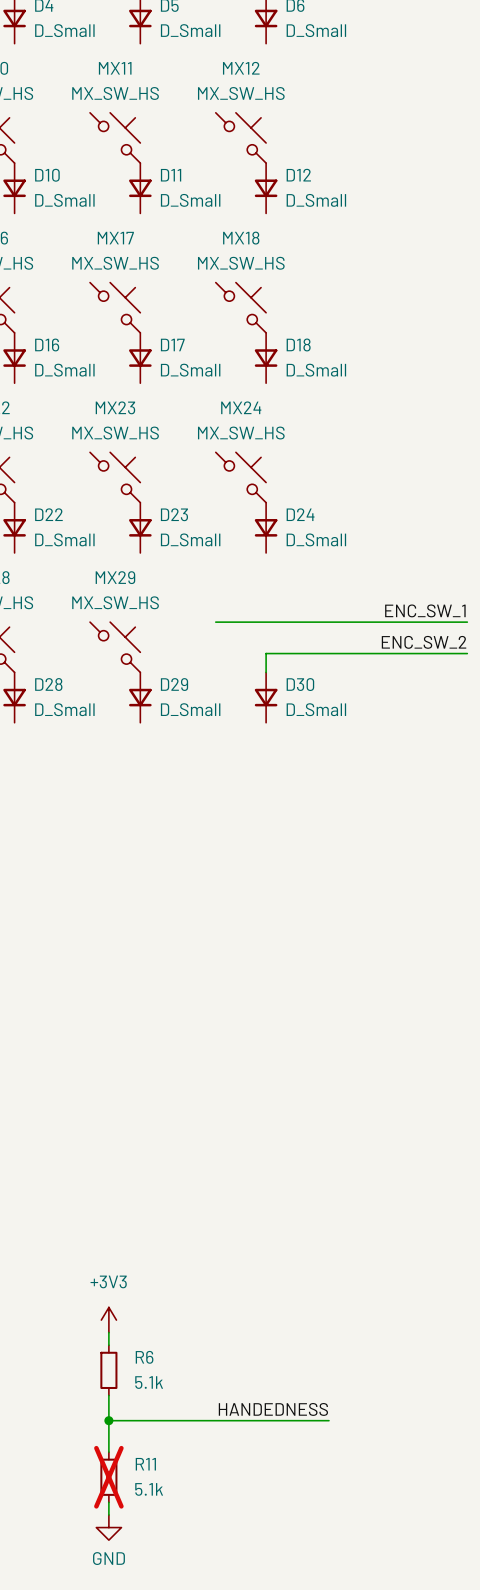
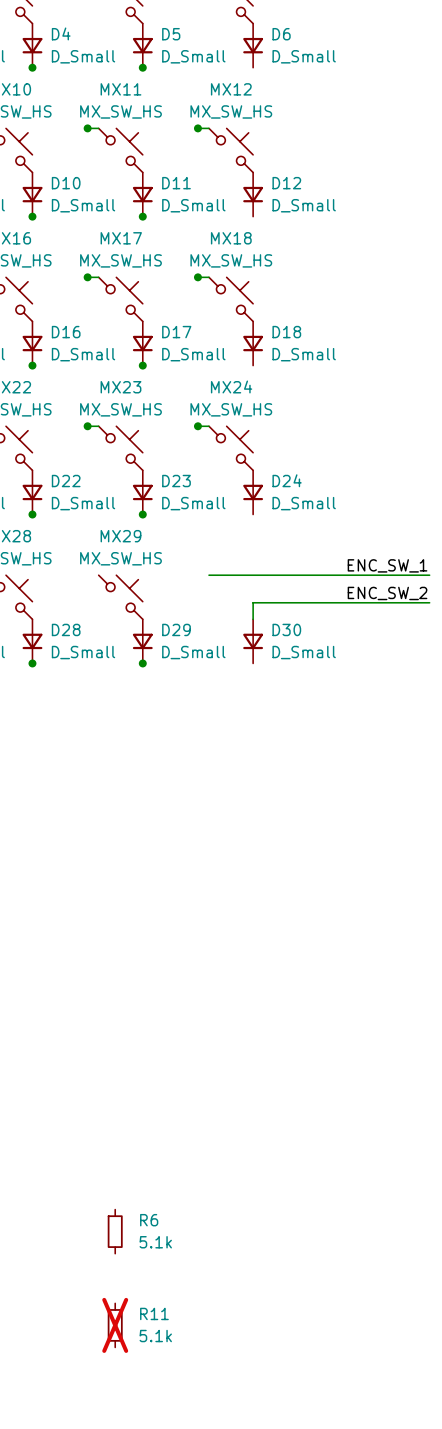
junction: none -> (32, 67)
junction: none -> (142, 67)
wire: none -> (87, 128) (98, 128)
junction: none -> (87, 128)
wire: none -> (197, 128) (208, 128)
junction: none -> (197, 128)
junction: none -> (32, 216)
junction: none -> (142, 216)
wire: none -> (87, 277) (98, 277)
junction: none -> (87, 277)
wire: none -> (197, 277) (208, 277)
junction: none -> (197, 277)
junction: none -> (32, 365)
junction: none -> (142, 365)
wire: none -> (87, 426) (98, 426)
junction: none -> (87, 426)
wire: none -> (197, 426) (208, 426)
junction: none -> (197, 426)
junction: none -> (32, 514)
junction: none -> (142, 514)
junction: none -> (32, 663)
junction: none -> (142, 663)
power symbol: +3V3 (108, 1320) -> none
wire: (108, 1332) (108, 1345) -> none
wire: (108, 1395) (108, 1452) -> none
label: HANDEDNESS (273, 1409) -> none
wire: (108, 1420) (328, 1420) -> none
junction: (108, 1420) -> none
wire: (108, 1502) (108, 1514) -> none
power symbol: GND (108, 1527) -> none

